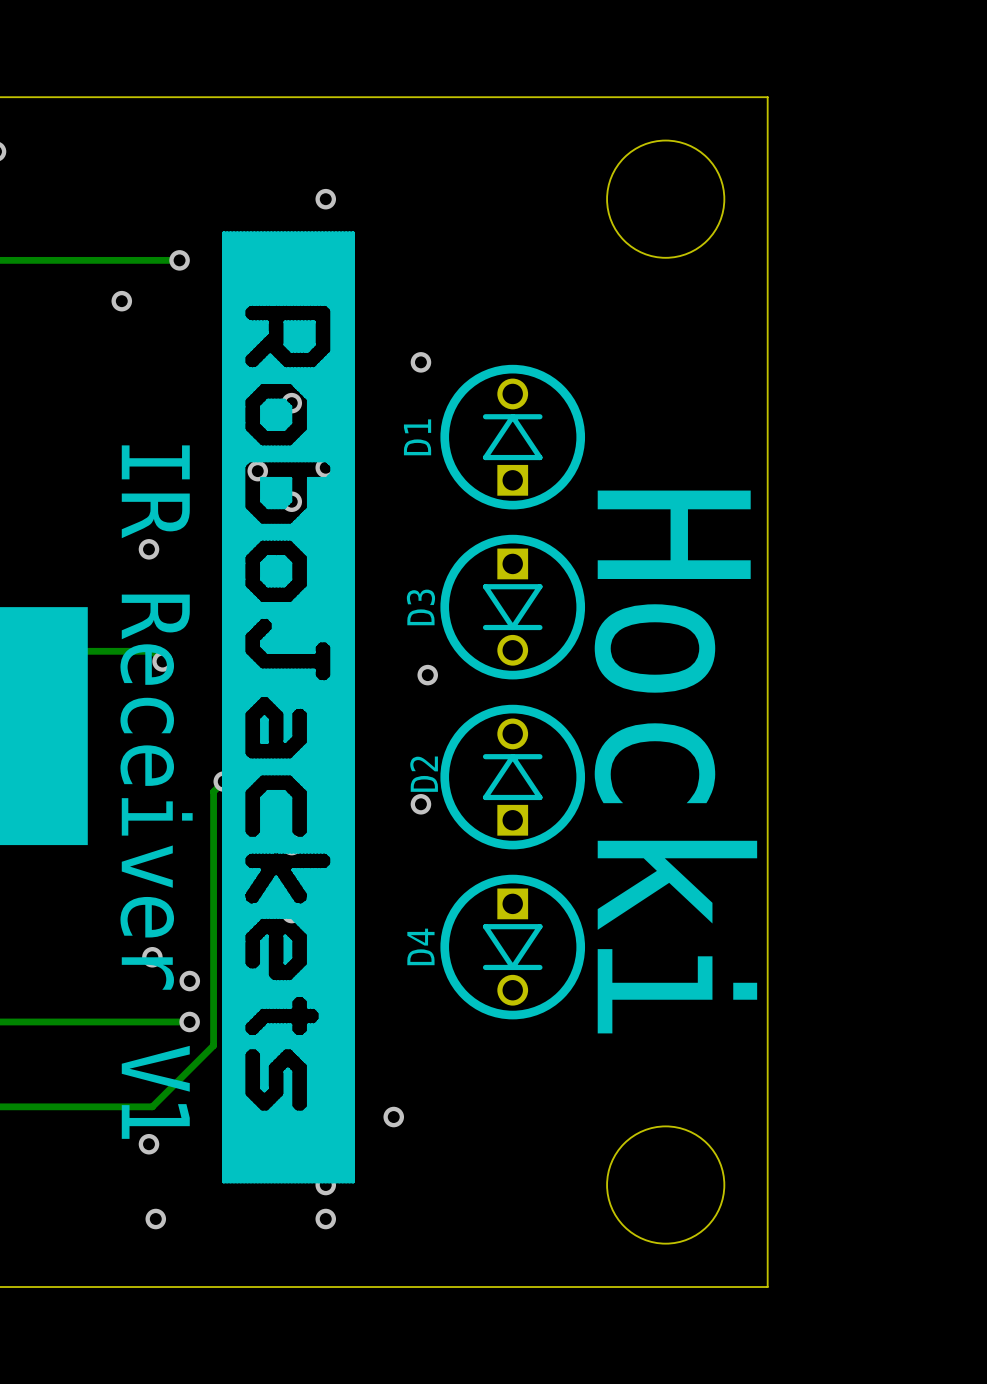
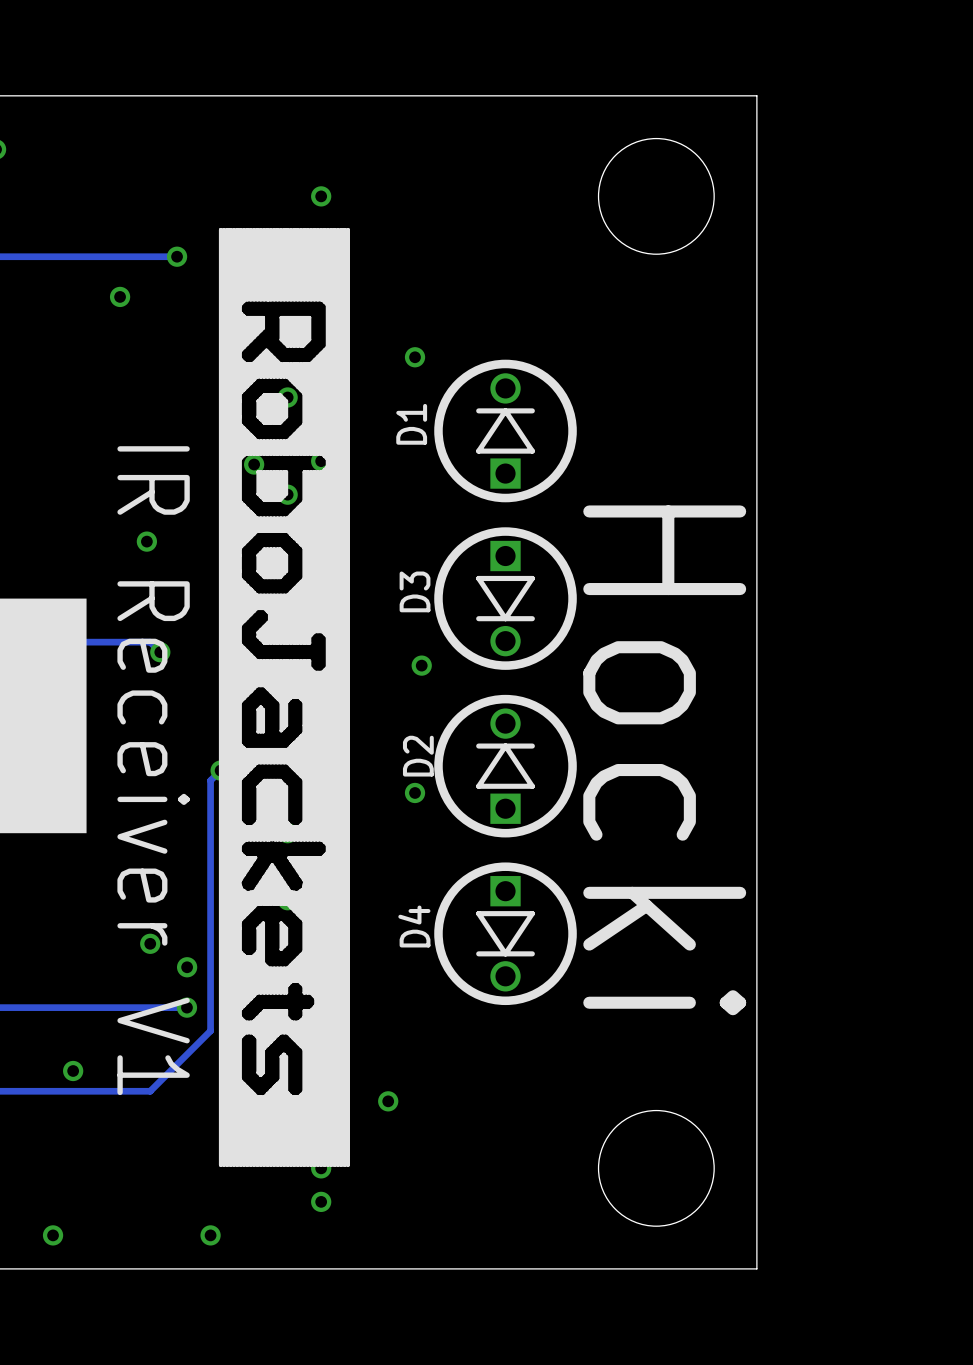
via: none -> (73, 1070)
via: (148, 1144) -> none
via: (155, 1219) -> none
via: none -> (53, 1235)
via: none -> (210, 1235)

